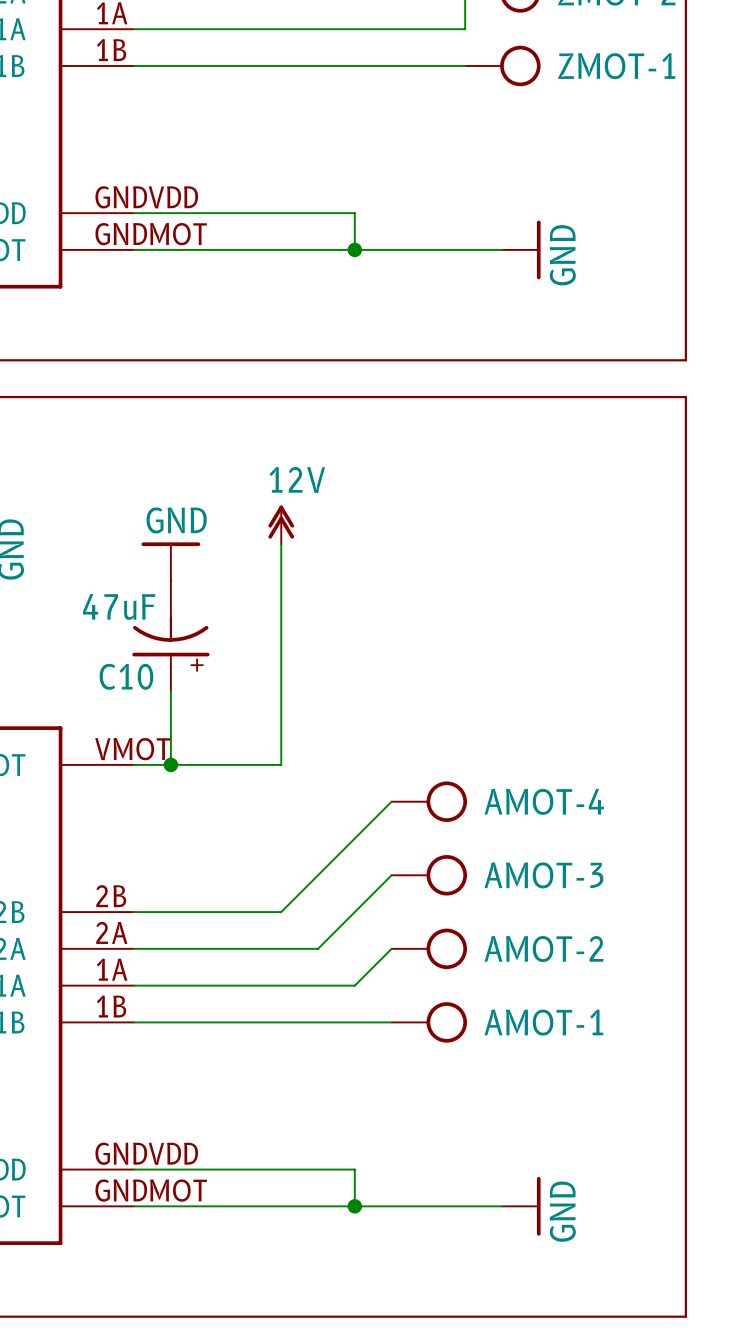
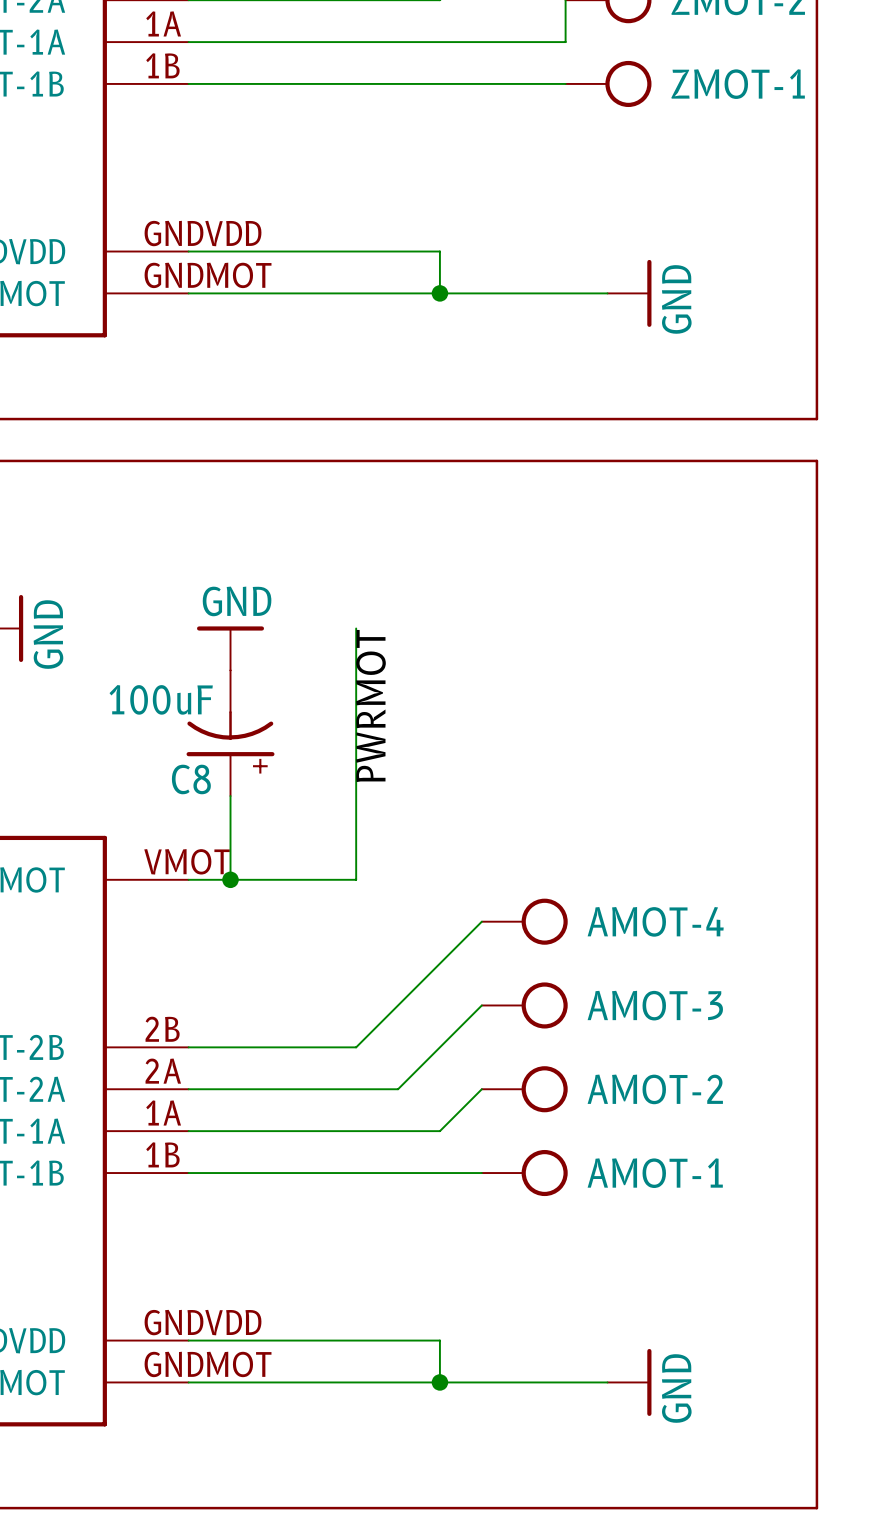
power symbol: 12V (281, 524) -> none
C10 value: 47uF (119, 606) -> 100uF (161, 699)
label: none -> PWRMOT (370, 706)
C10 name: C10 (126, 676) -> C8 (191, 779)

